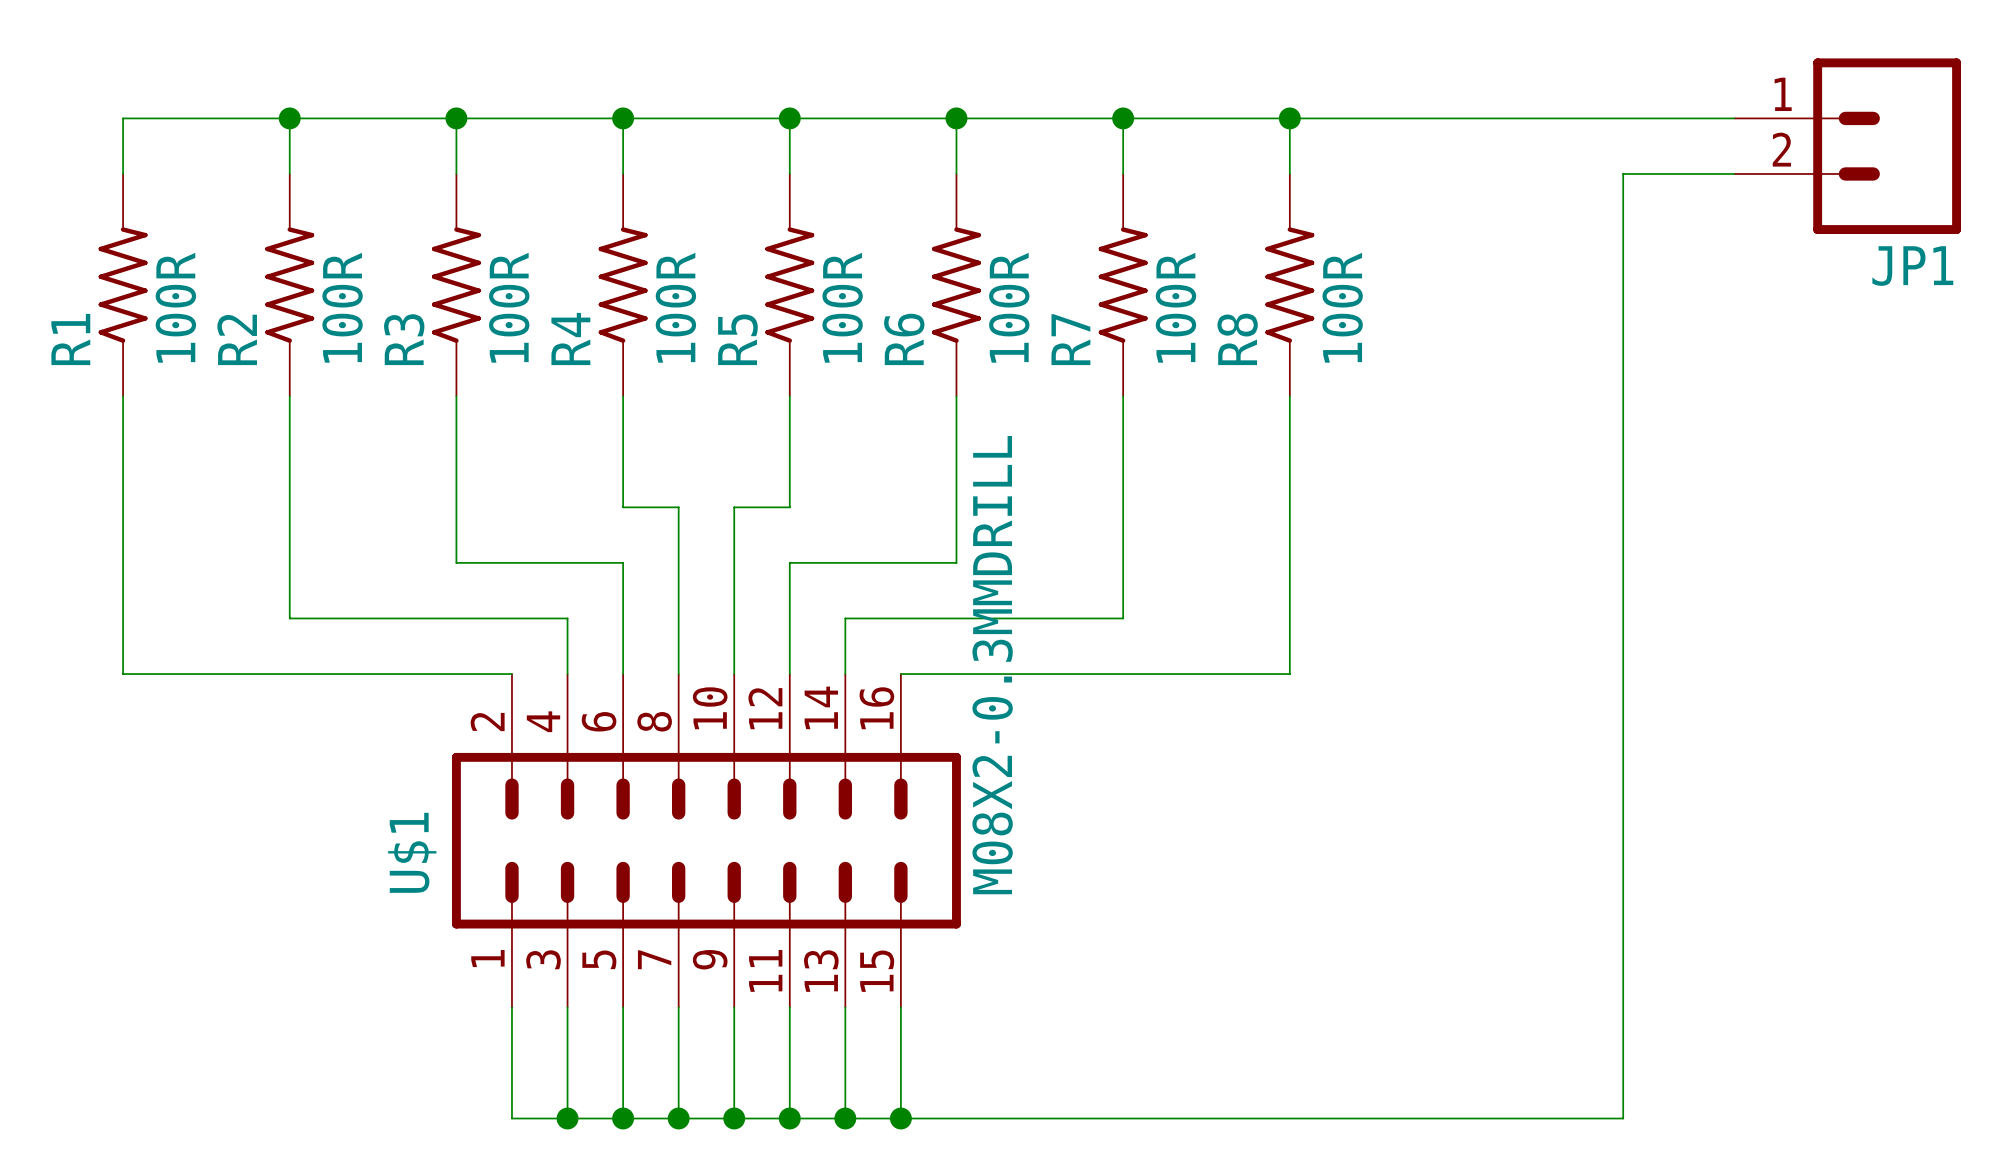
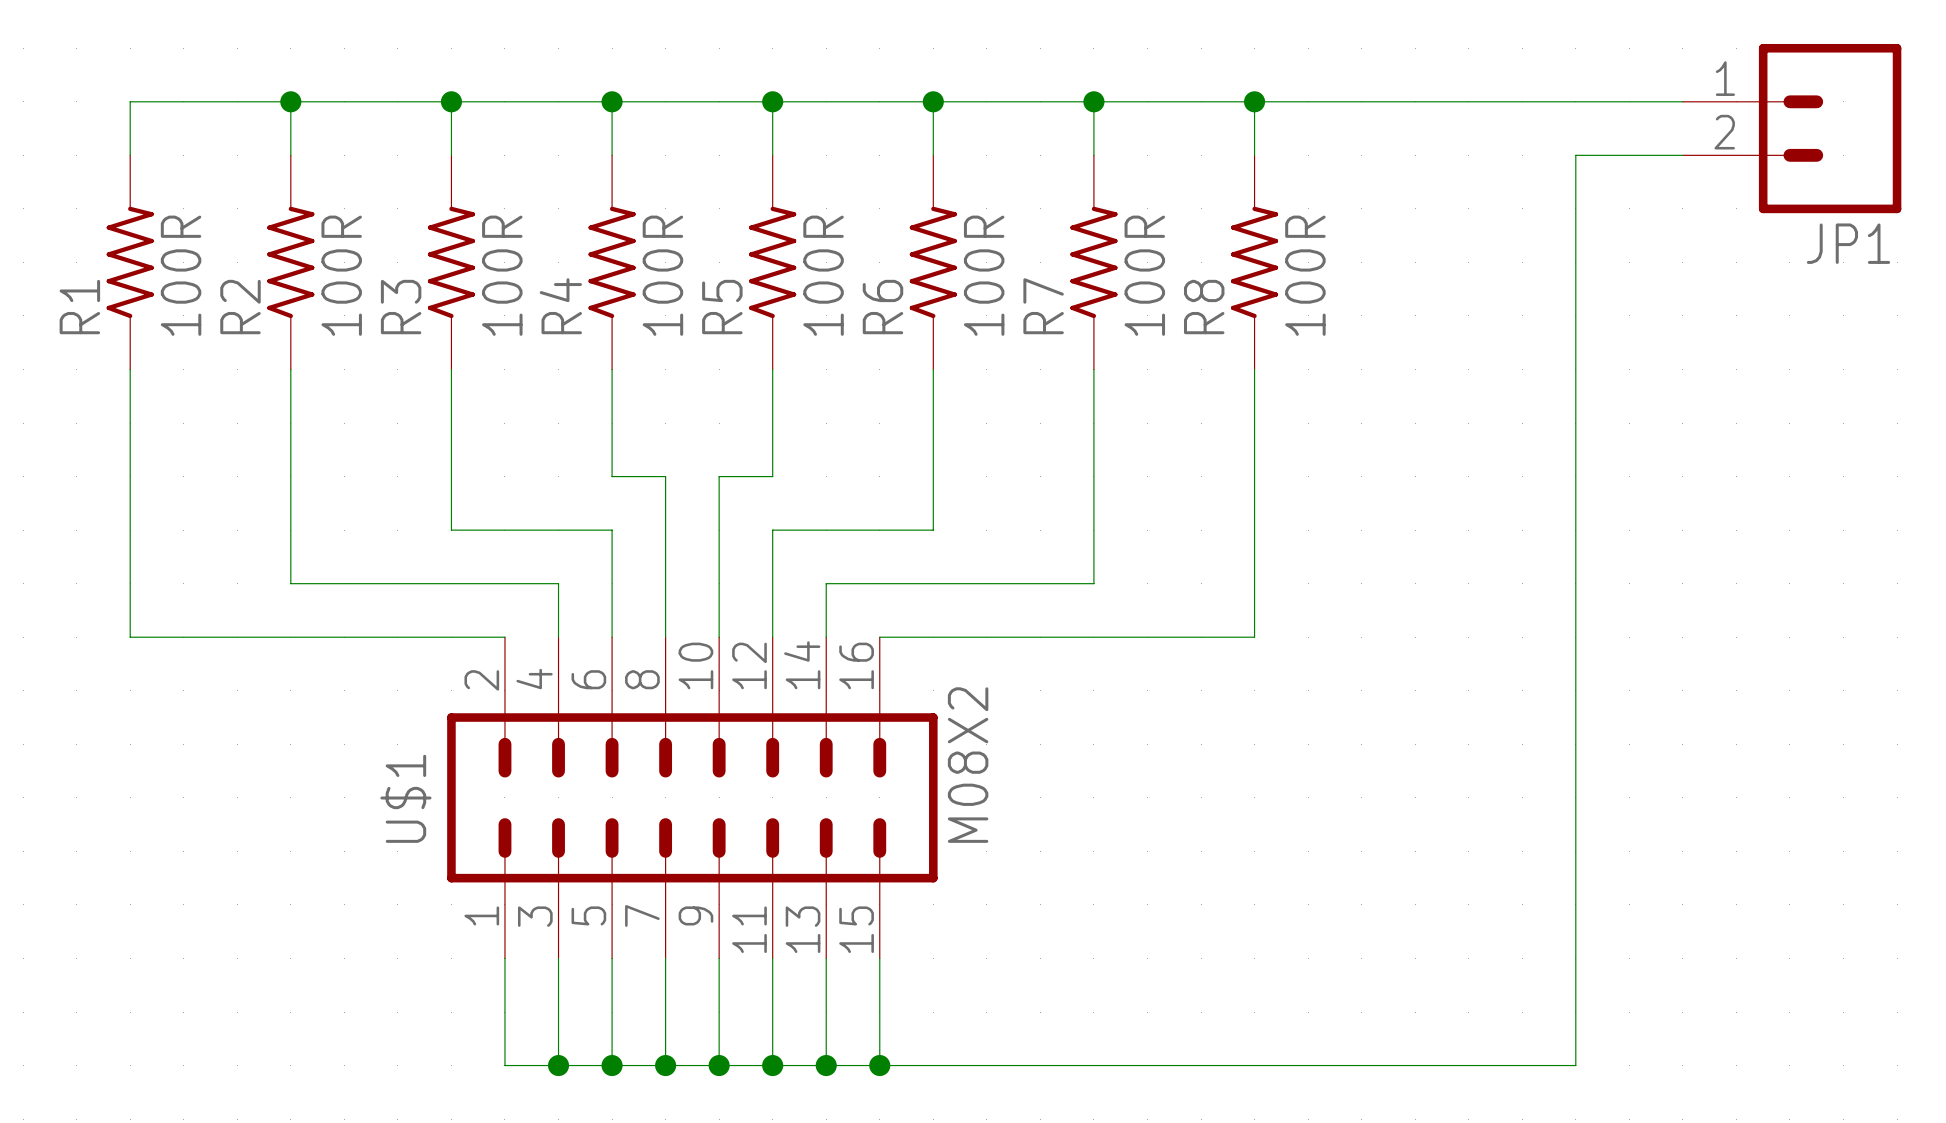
U$1 value: M08X2-0.3MMDRILL (992, 665) -> M08X2 (968, 765)

